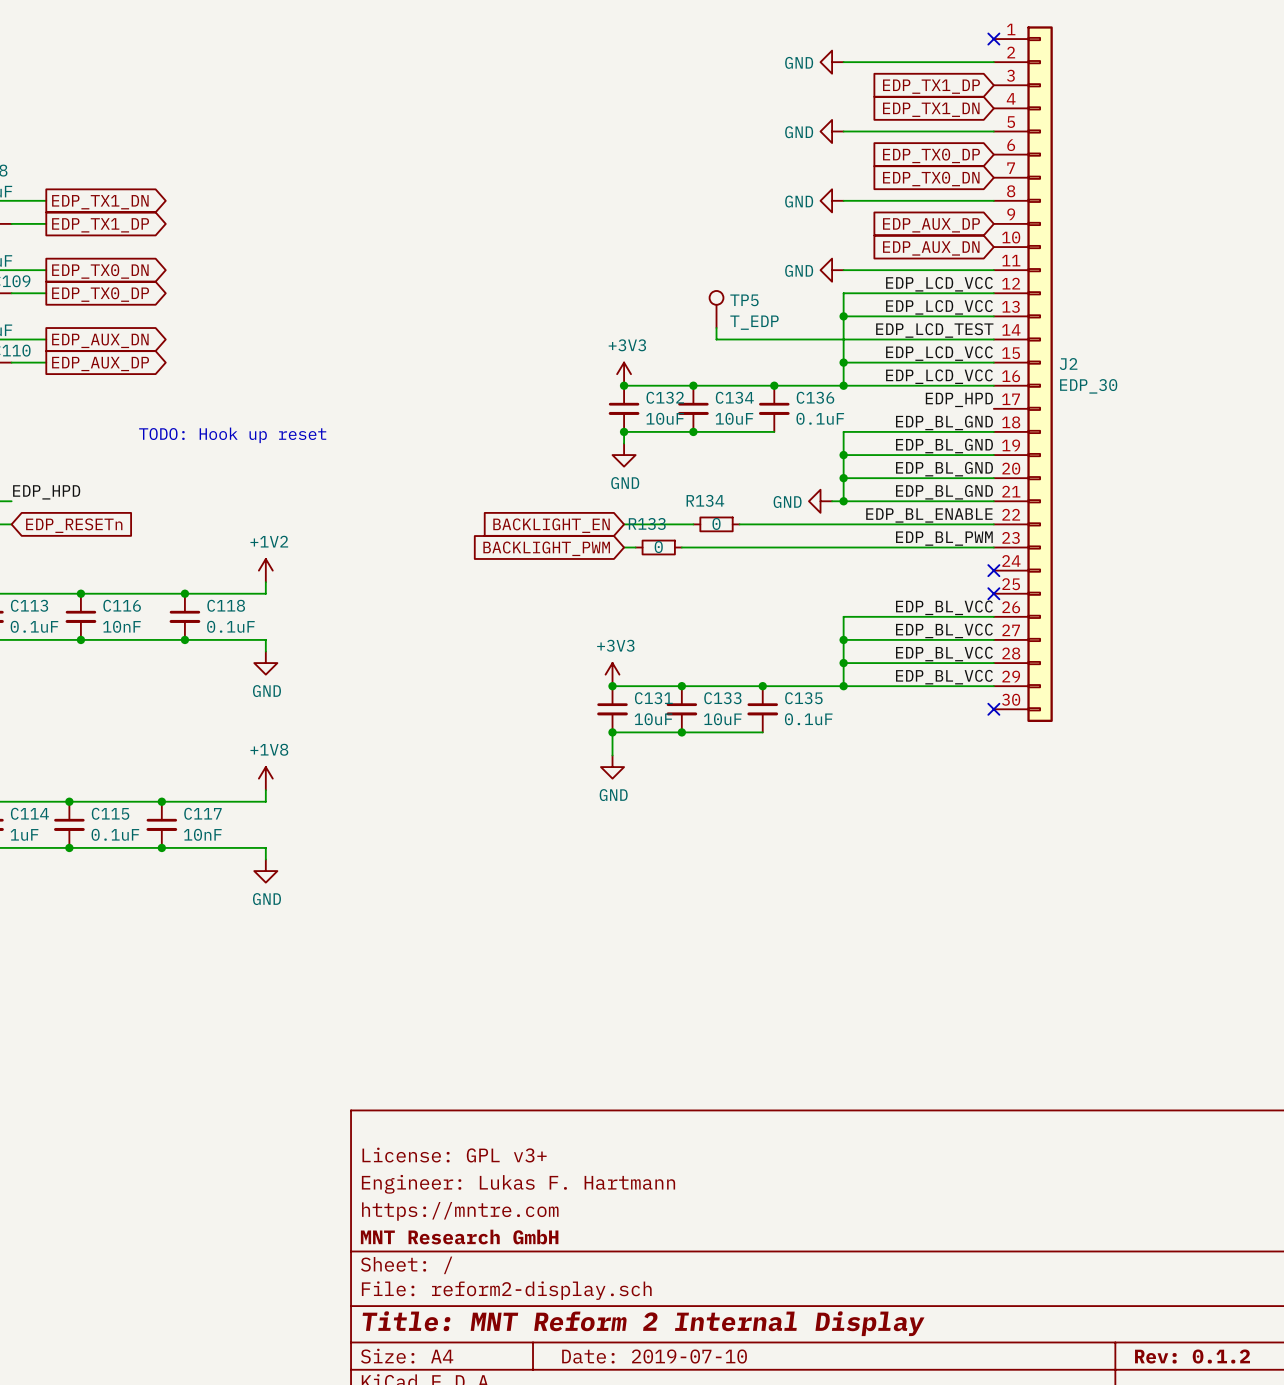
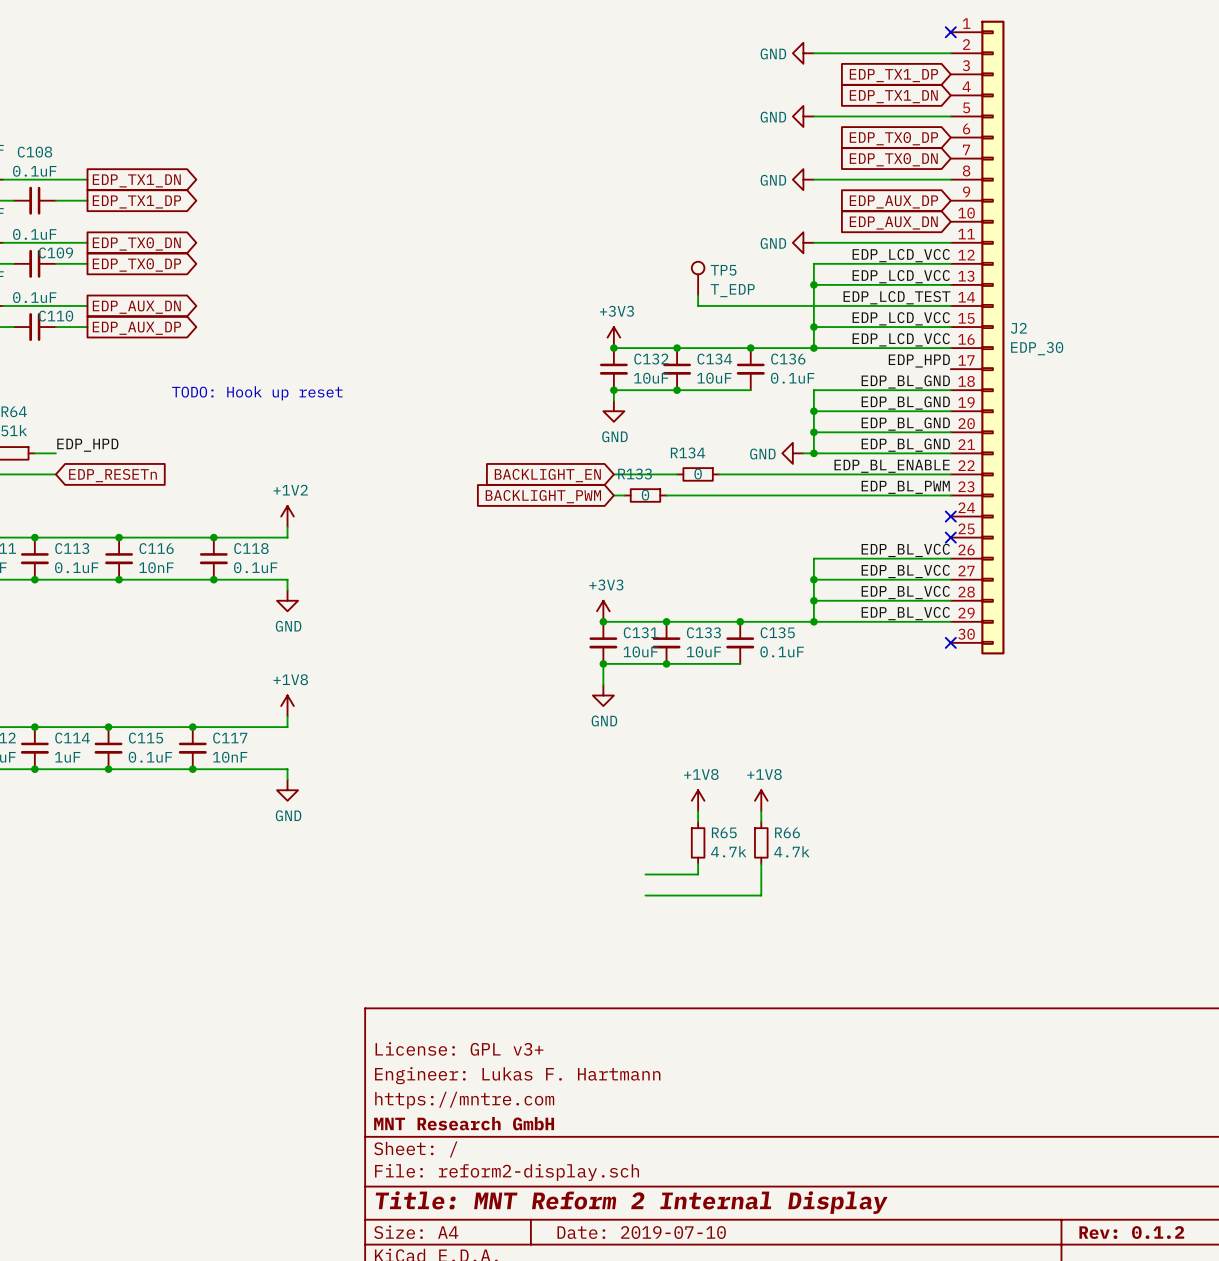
power symbol: none -> +1V8 (698, 800)
power symbol: none -> +1V8 (761, 800)
wire: none -> (698, 811) (698, 821)
wire: none -> (761, 811) (761, 821)
R65: none -> 4.7k (698, 842)
R66: none -> 4.7k (761, 842)
wire: none -> (698, 863) (698, 874) (645, 874)
wire: none -> (761, 863) (761, 895) (645, 895)

